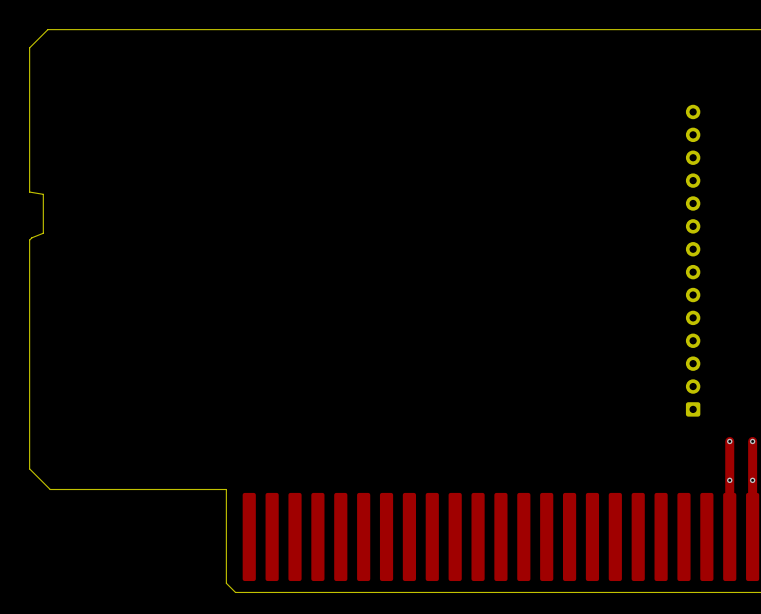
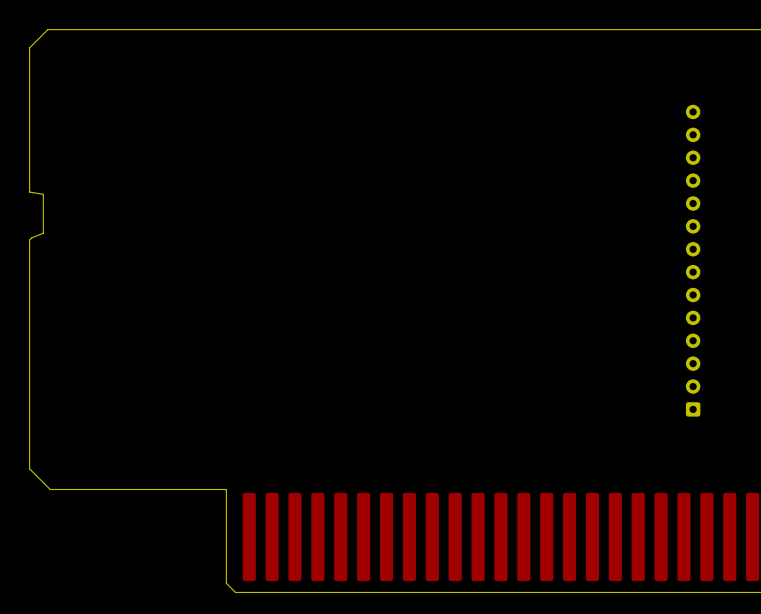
track: (729, 441) (729, 536) -> none
via: (729, 441) -> none
track: (752, 441) (752, 536) -> none
via: (752, 441) -> none
via: (729, 480) -> none
via: (752, 480) -> none

